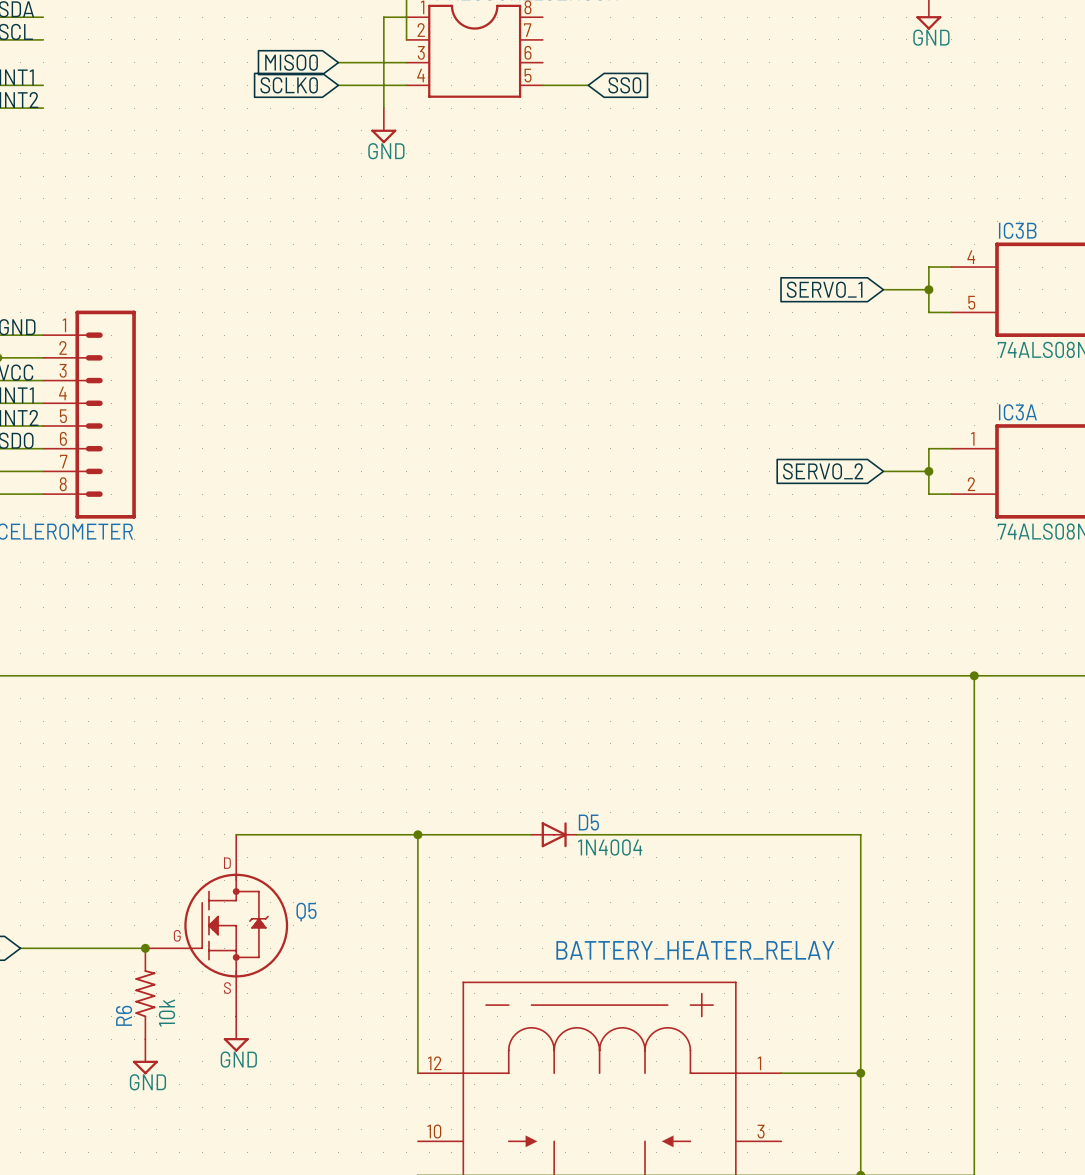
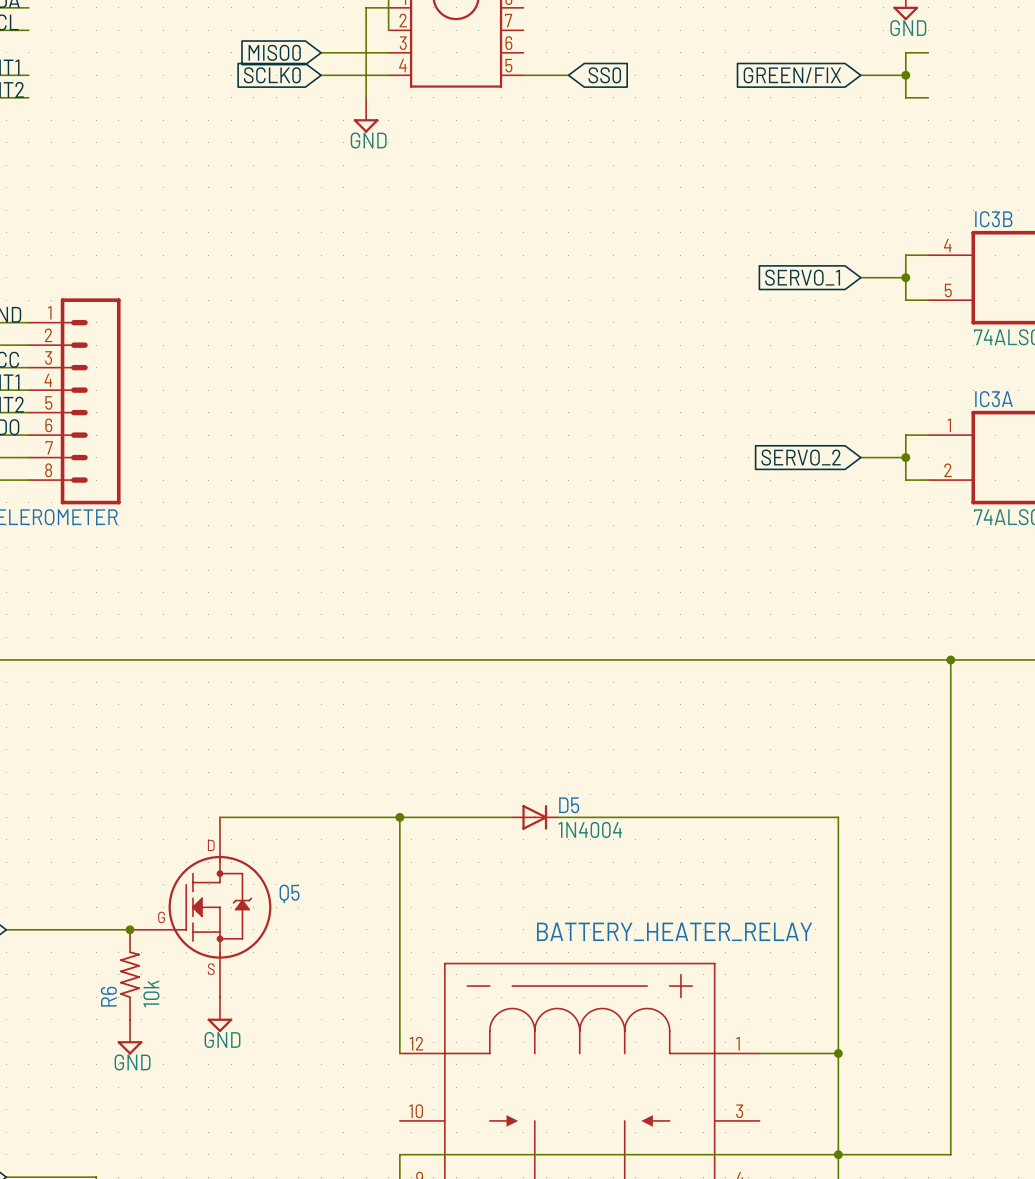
wire: none -> (928, 52) (905, 52) (905, 97) (928, 97)
global label: none -> GREEN/FIX (792, 75)
wire: none -> (860, 75) (905, 75)
junction: none -> (905, 75)

